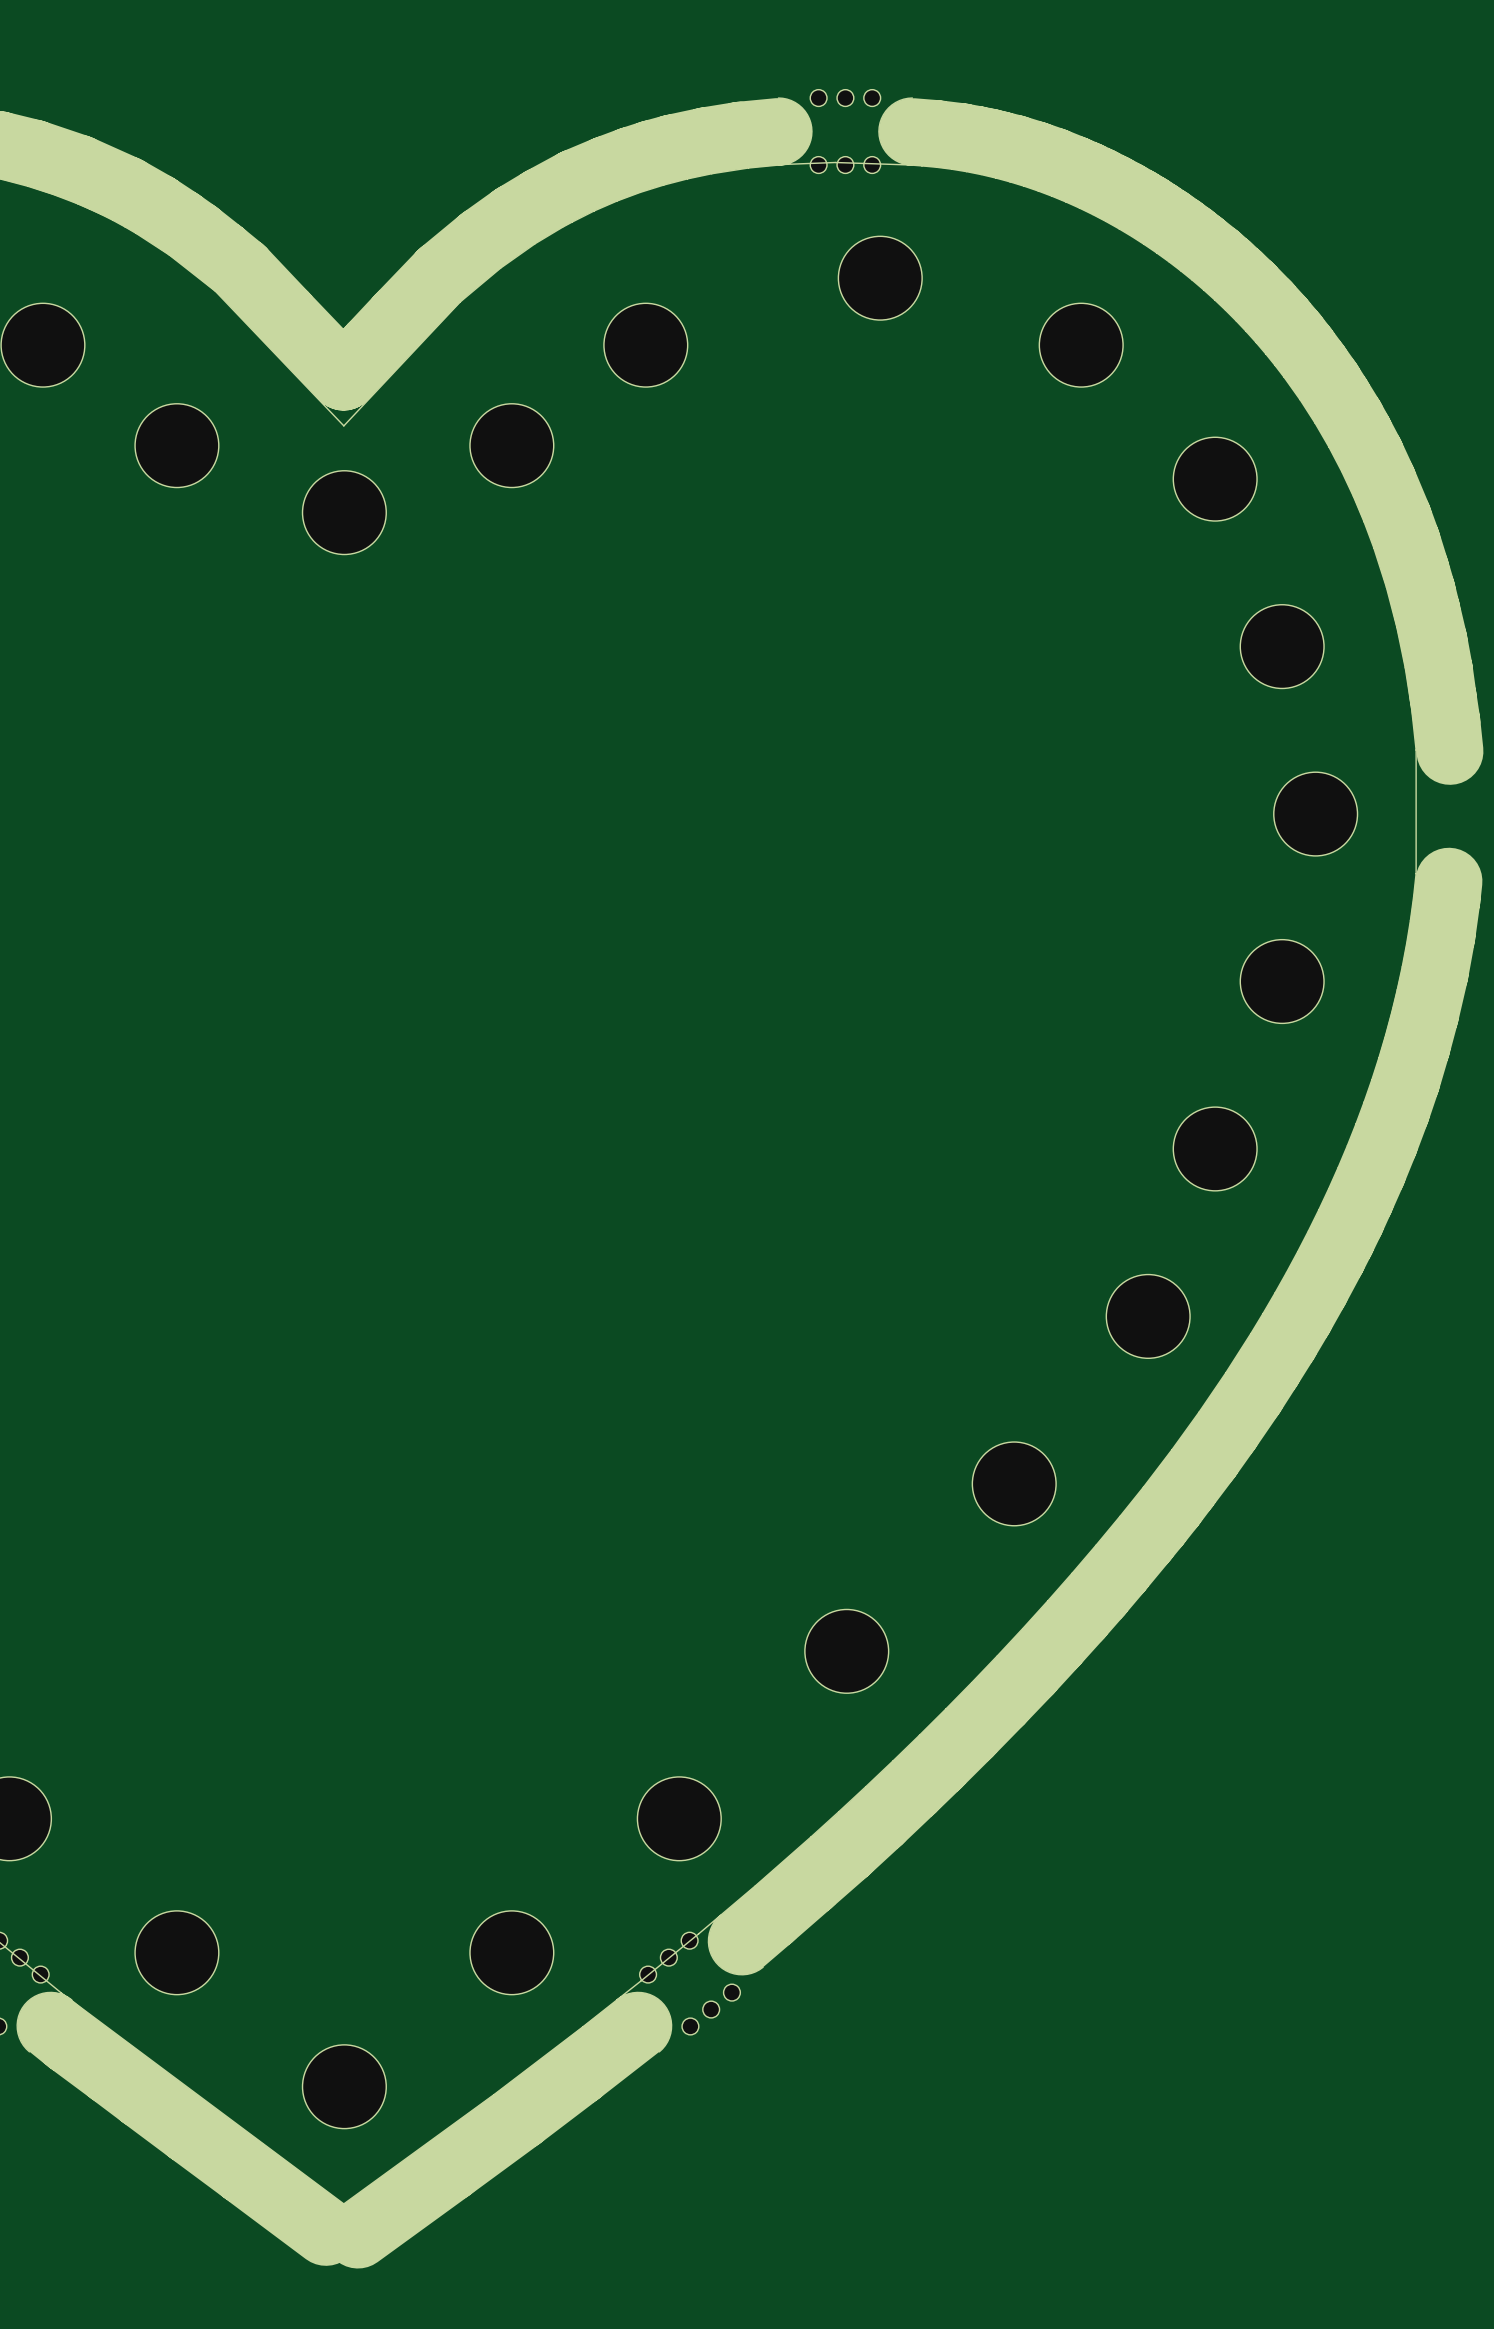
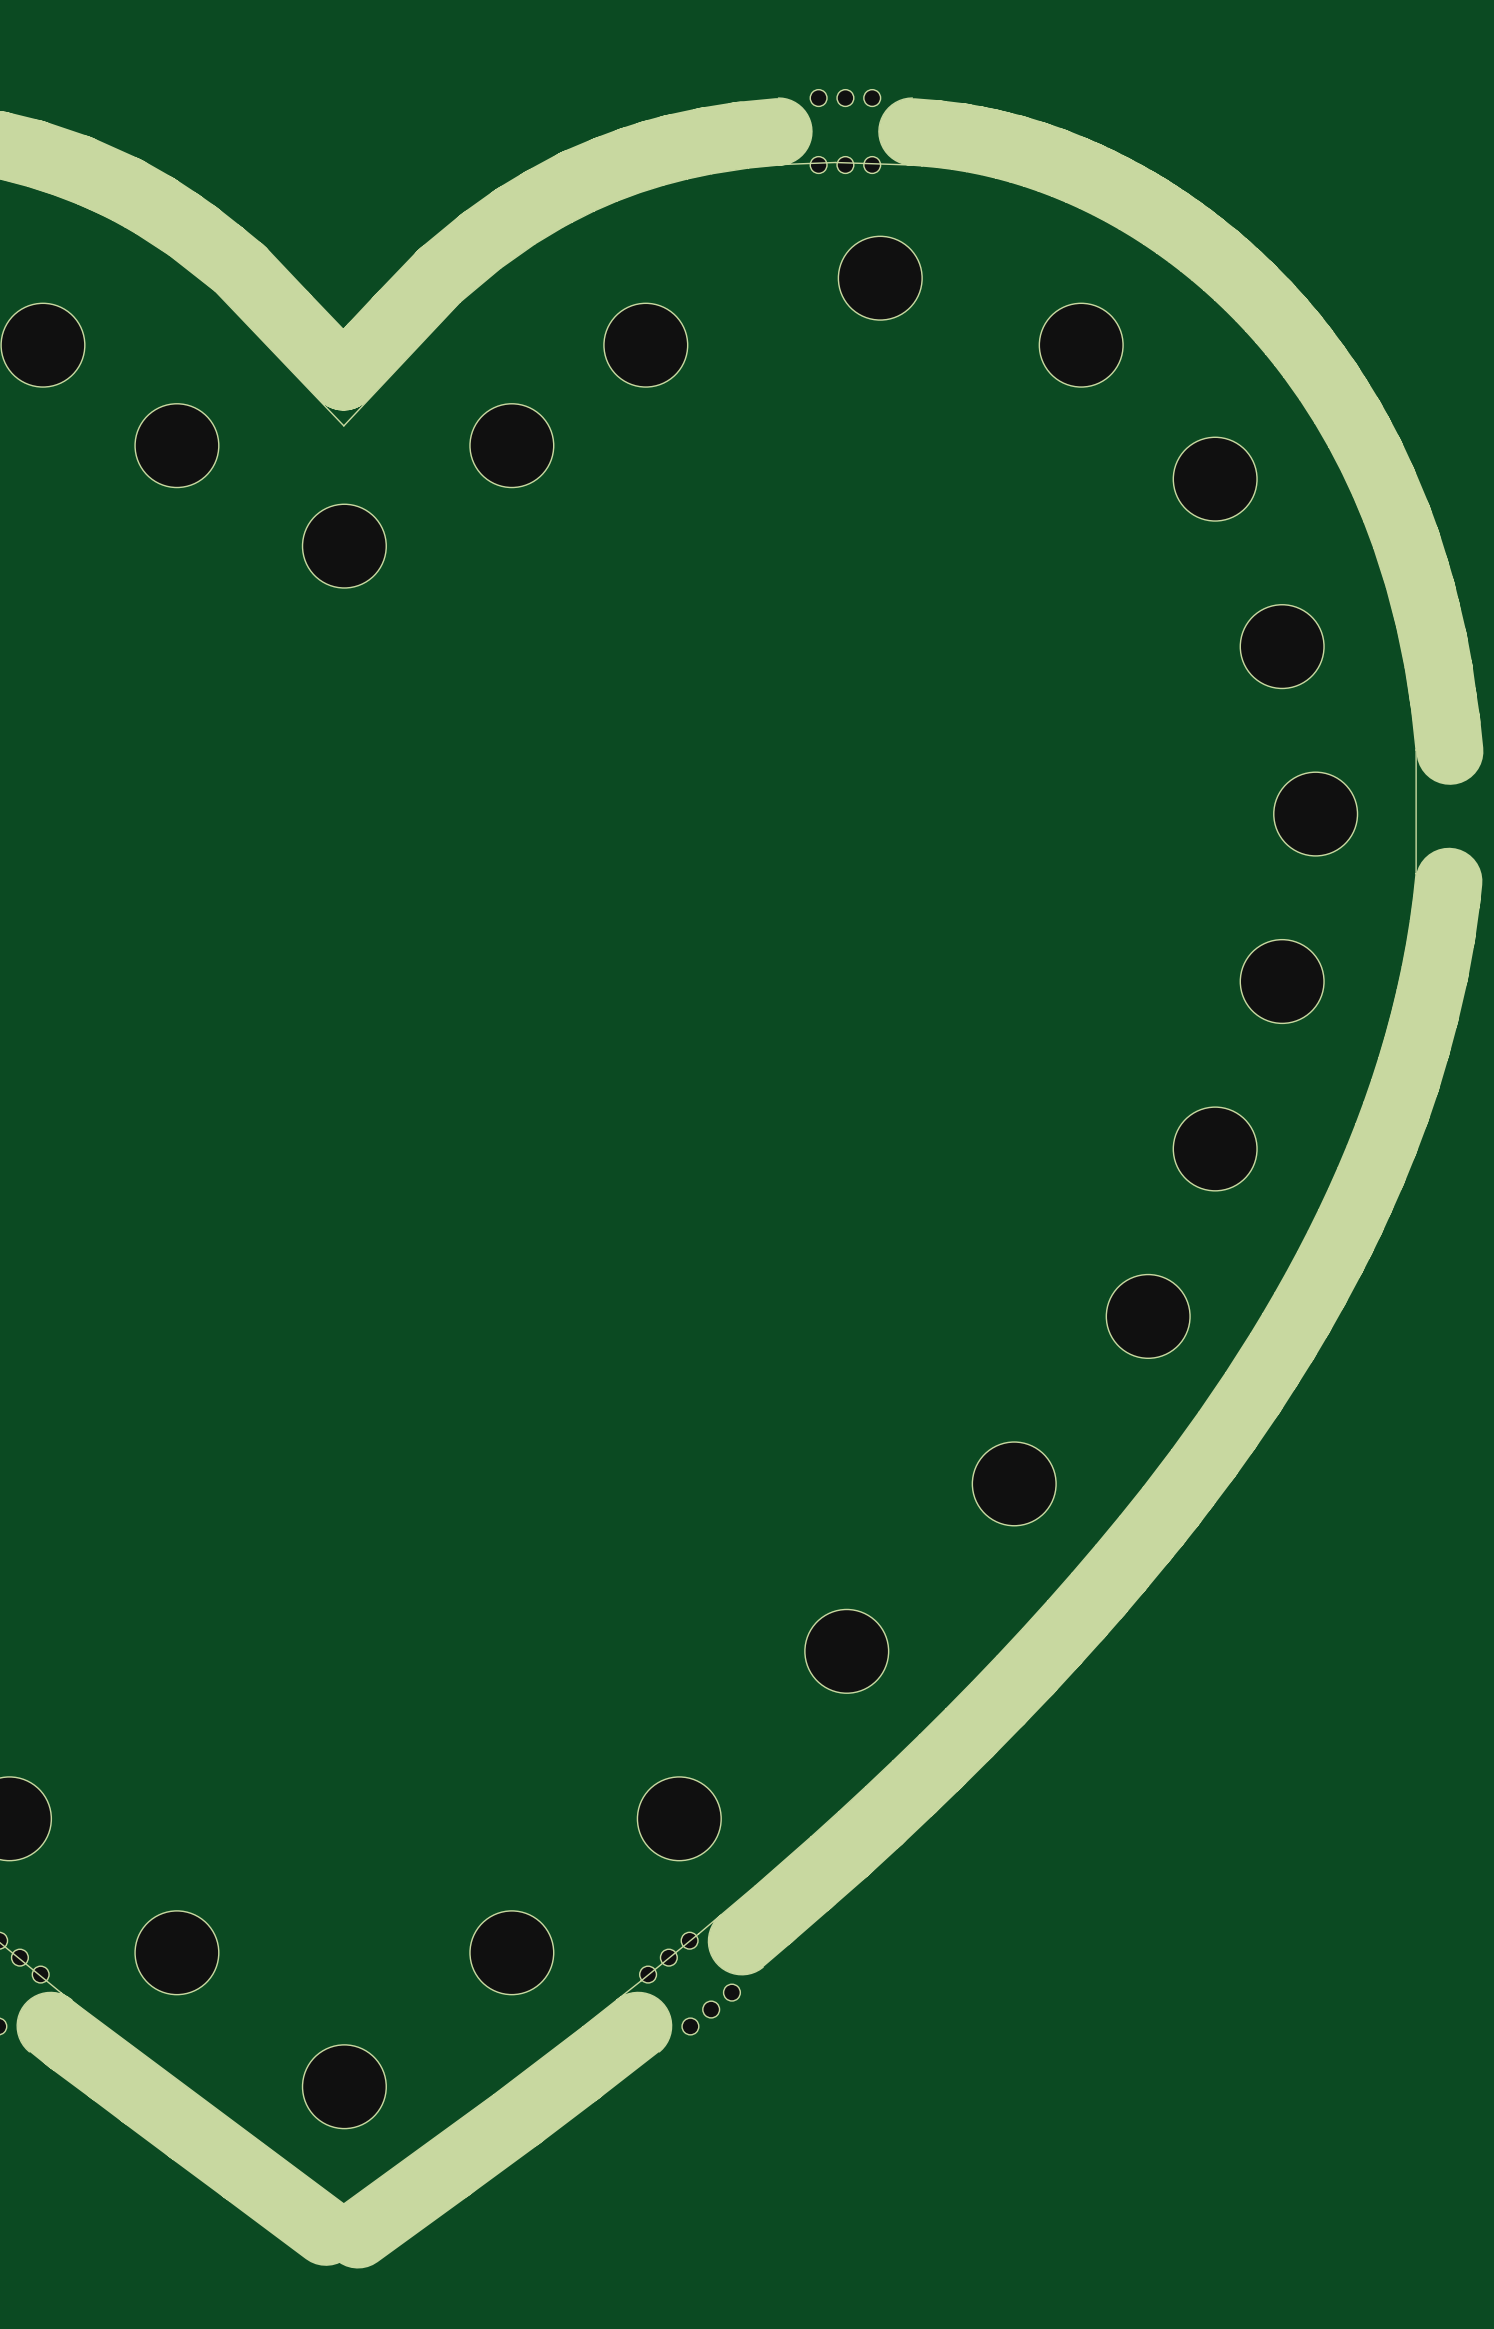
part position: (344, 512) -> (344, 546)

